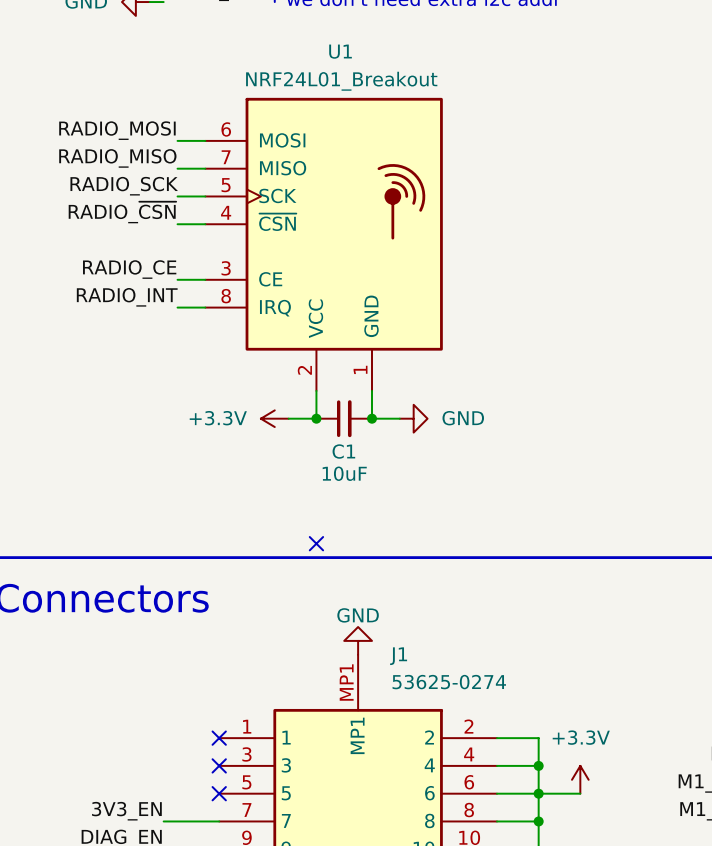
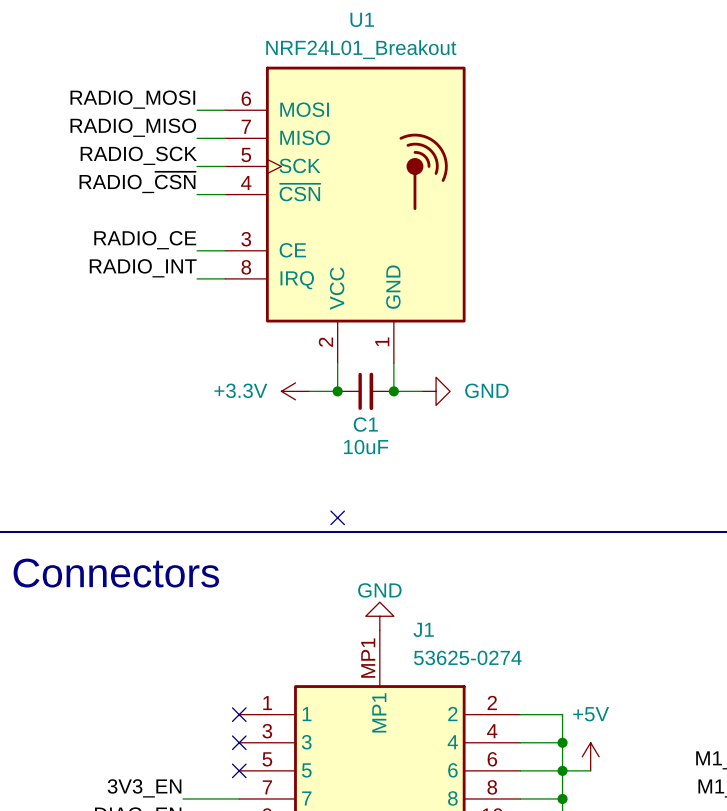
power symbol: none -> +5V (590, 756)
power symbol: +3.3V (580, 779) -> none
wire: (566, 793) (580, 793) -> none

